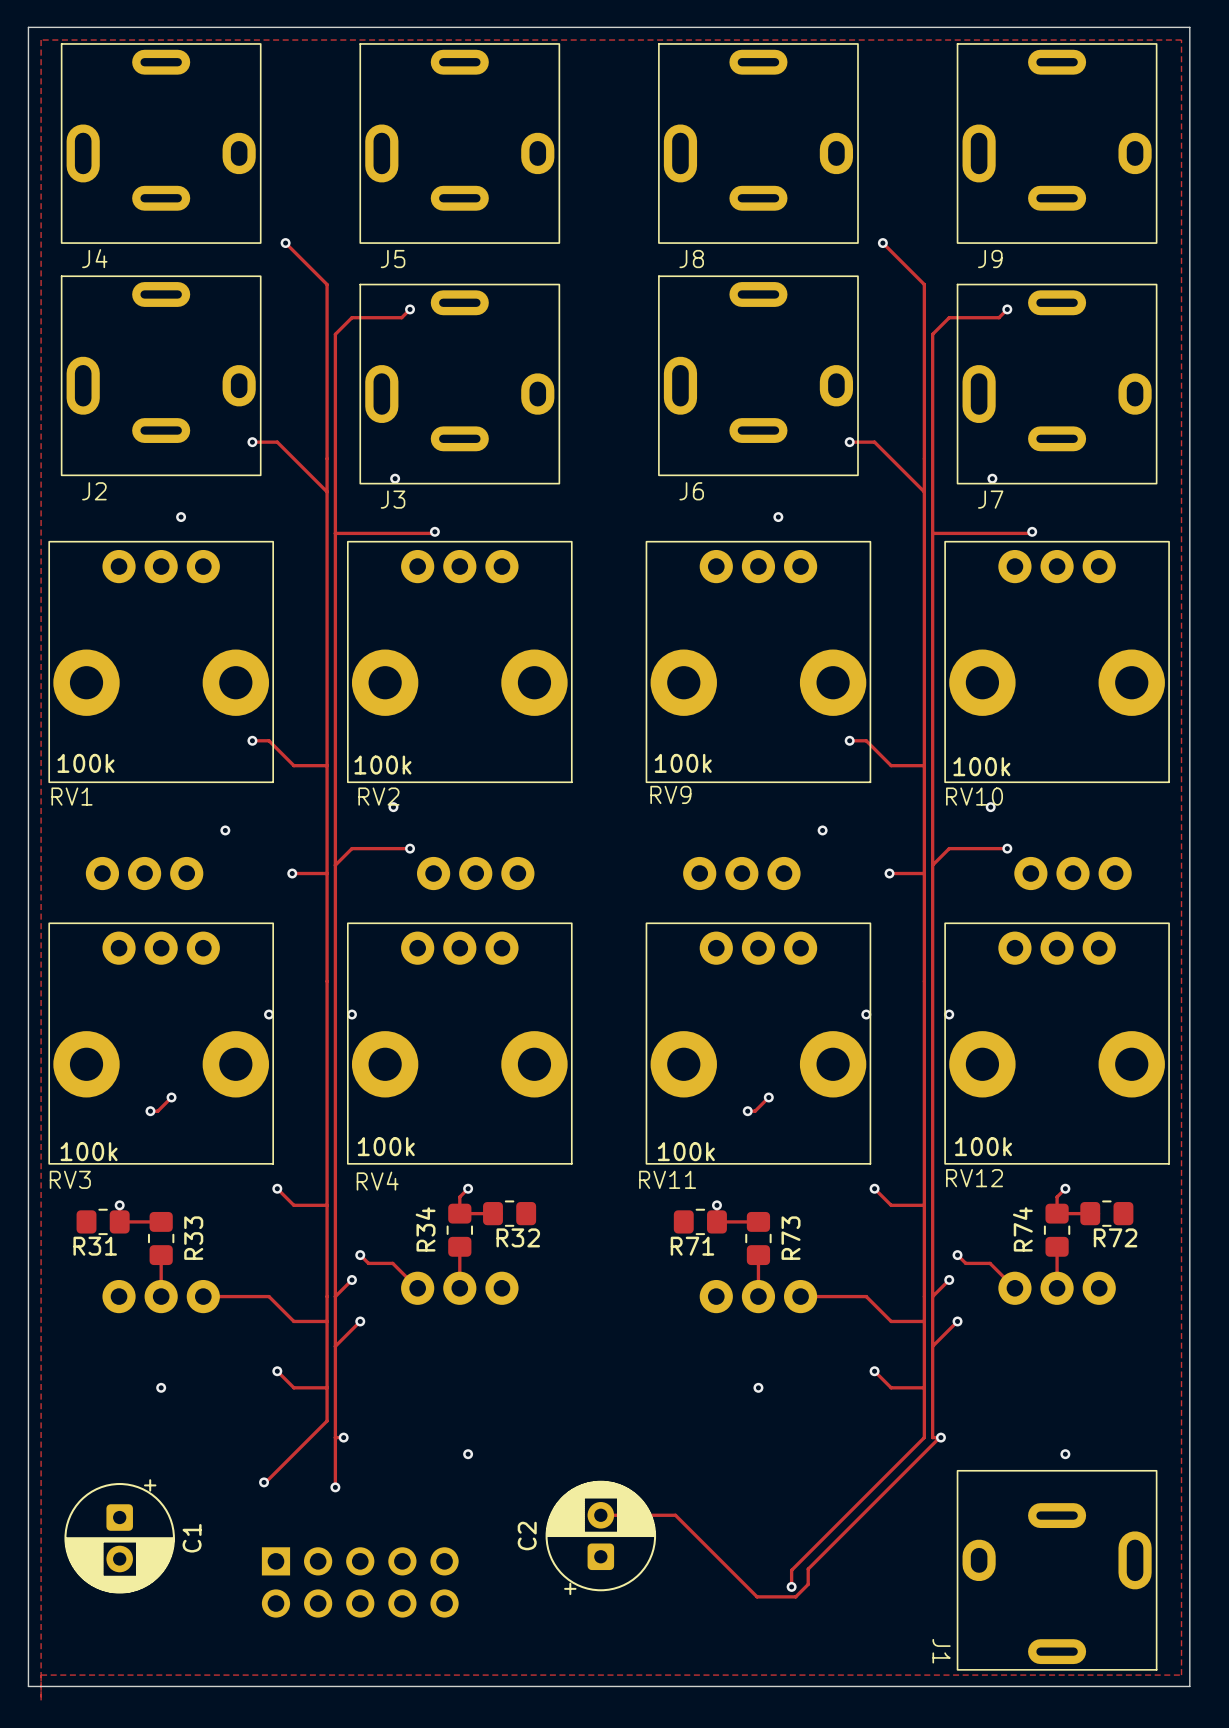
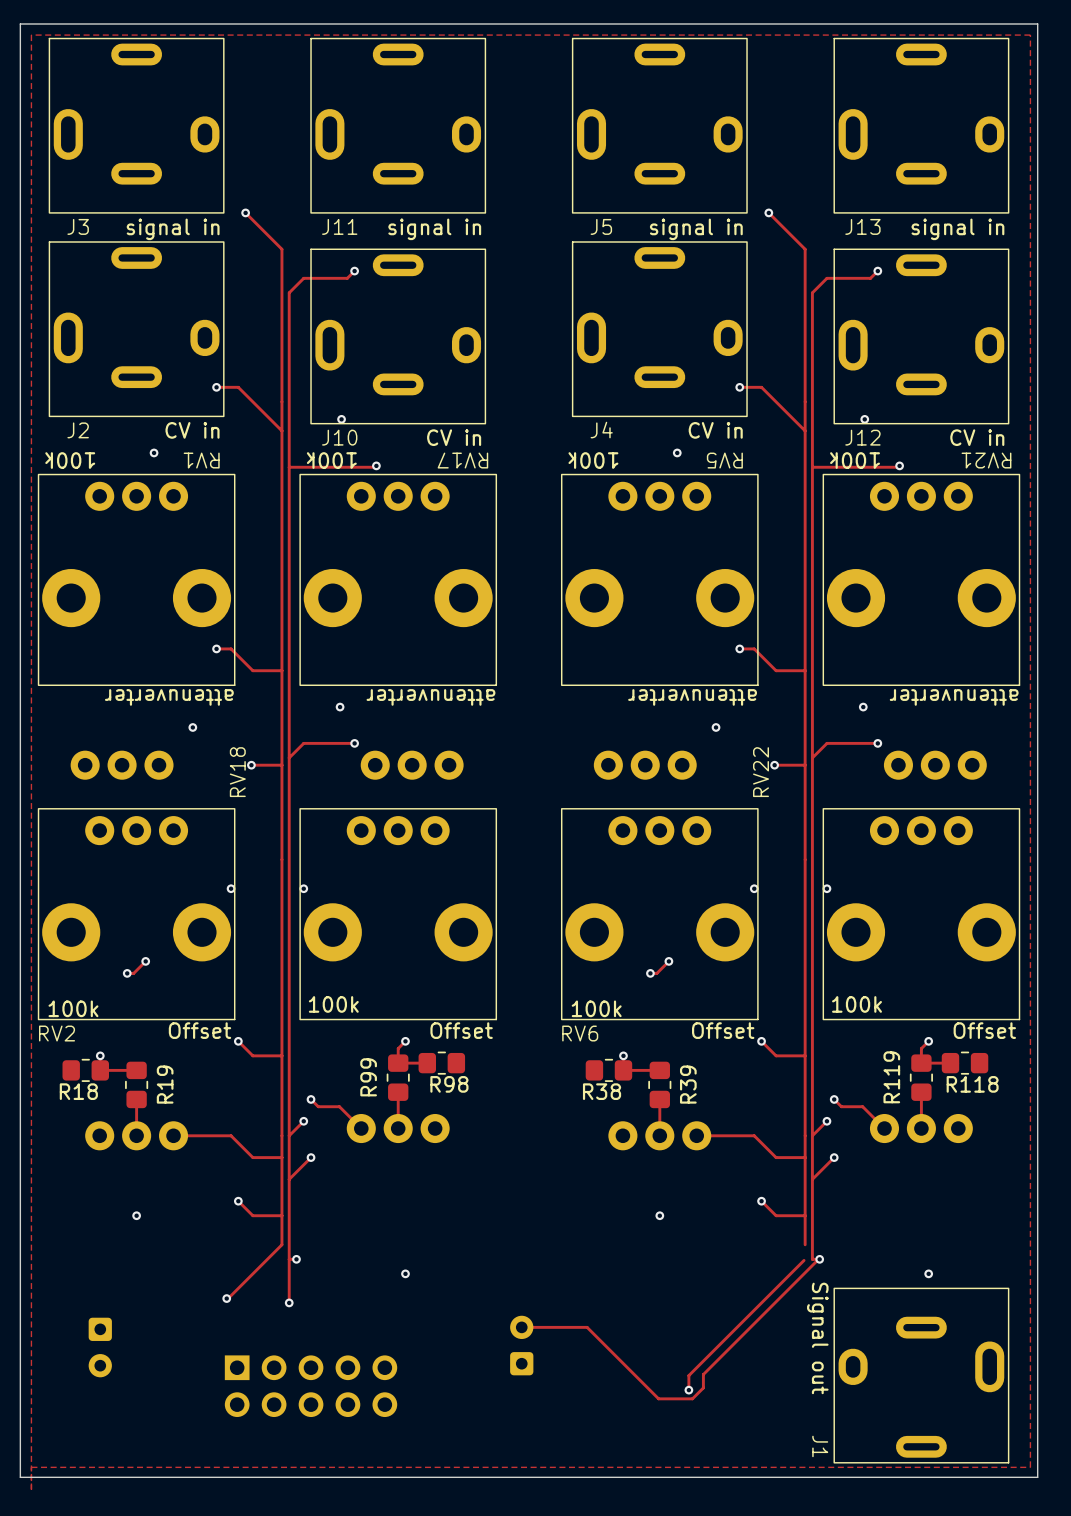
J4 name: J4 (94, 258) -> J3 (78, 226)
J5 name: J5 (393, 259) -> J11 (339, 226)
J8 name: J8 (691, 259) -> J5 (601, 226)
J9 name: J9 (990, 259) -> J13 (862, 226)
J4 value: none -> signal in (173, 229)
J5 value: none -> signal in (434, 229)
J8 value: none -> signal in (696, 229)
J9 value: none -> signal in (957, 229)
J2 value: none -> CV in (192, 430)
J6 name: J6 (691, 491) -> J4 (601, 430)
J6 value: none -> CV in (715, 430)
J3 name: J3 (393, 499) -> J10 (339, 437)
J3 value: none -> CV in (454, 437)
J7 name: J7 (990, 499) -> J12 (862, 437)
J7 value: none -> CV in (977, 437)
RV1 value rotation: 0° (85, 763) -> 180° (70, 460)
RV1 value position: 100k (85, 763) -> 100k (70, 460)
RV9 value rotation: 0° (683, 763) -> 180° (593, 460)
RV9 value position: 100k (683, 763) -> 100k (593, 460)
RV2 value rotation: 0° (382, 765) -> 180° (331, 460)
RV2 value position: 100k (382, 765) -> 100k (331, 460)
RV10 value rotation: 0° (981, 766) -> 180° (855, 460)
RV10 value position: 100k (981, 766) -> 100k (855, 460)
RV9 name: RV9 (670, 794) -> RV5 (724, 460)
RV1 name rotation: 0° (71, 796) -> 180° (201, 460)
RV1 name position: RV1 (71, 796) -> RV1 (201, 460)
RV1 text: none -> attenuverter (169, 697)
RV2 name: RV2 (378, 796) -> RV17 (462, 460)
RV2 text: none -> attenuverter (430, 697)
RV9 text: none -> attenuverter (692, 697)
RV10 name: RV10 (974, 796) -> RV21 (986, 460)
RV10 text: none -> attenuverter (954, 697)
RV3 text: none -> Offset (199, 1030)
RV4 text: none -> Offset (461, 1030)
RV11 text: none -> Offset (723, 1030)
RV12 text: none -> Offset (984, 1030)
RV12 name: RV12 (974, 1178) -> RV22 (761, 772)
RV3 name: RV3 (70, 1179) -> RV2 (57, 1033)
RV11 name: RV11 (667, 1179) -> RV6 (580, 1033)
RV4 name: RV4 (377, 1181) -> RV18 (237, 772)
R34 name: R34 (425, 1229) -> R99 (368, 1077)
R74 name: R74 (1022, 1229) -> R119 (891, 1077)
R32 name: R32 (518, 1237) -> R98 (449, 1084)
R72 name: R72 (1115, 1237) -> R118 (972, 1084)
R33 name: R33 (193, 1238) -> R19 (165, 1084)
R73 name: R73 (791, 1238) -> R39 (688, 1084)
R31 name: R31 (95, 1246) -> R18 (78, 1091)
R71 name: R71 (692, 1246) -> R38 (602, 1091)
track: (924, 1421) (923, 1438) -> none
J1 value: none -> Signal out (817, 1338)
C1 side: top (119, 1536) -> bottom (100, 1347)
C2 side: top (600, 1537) -> bottom (521, 1345)

